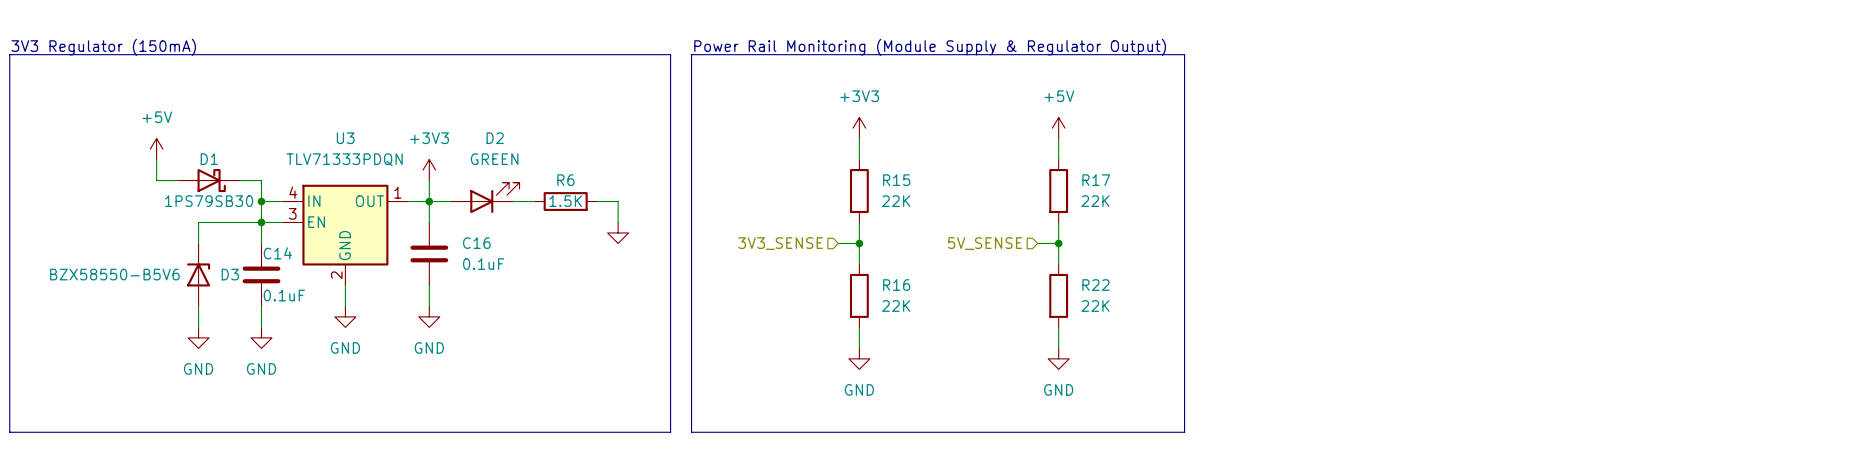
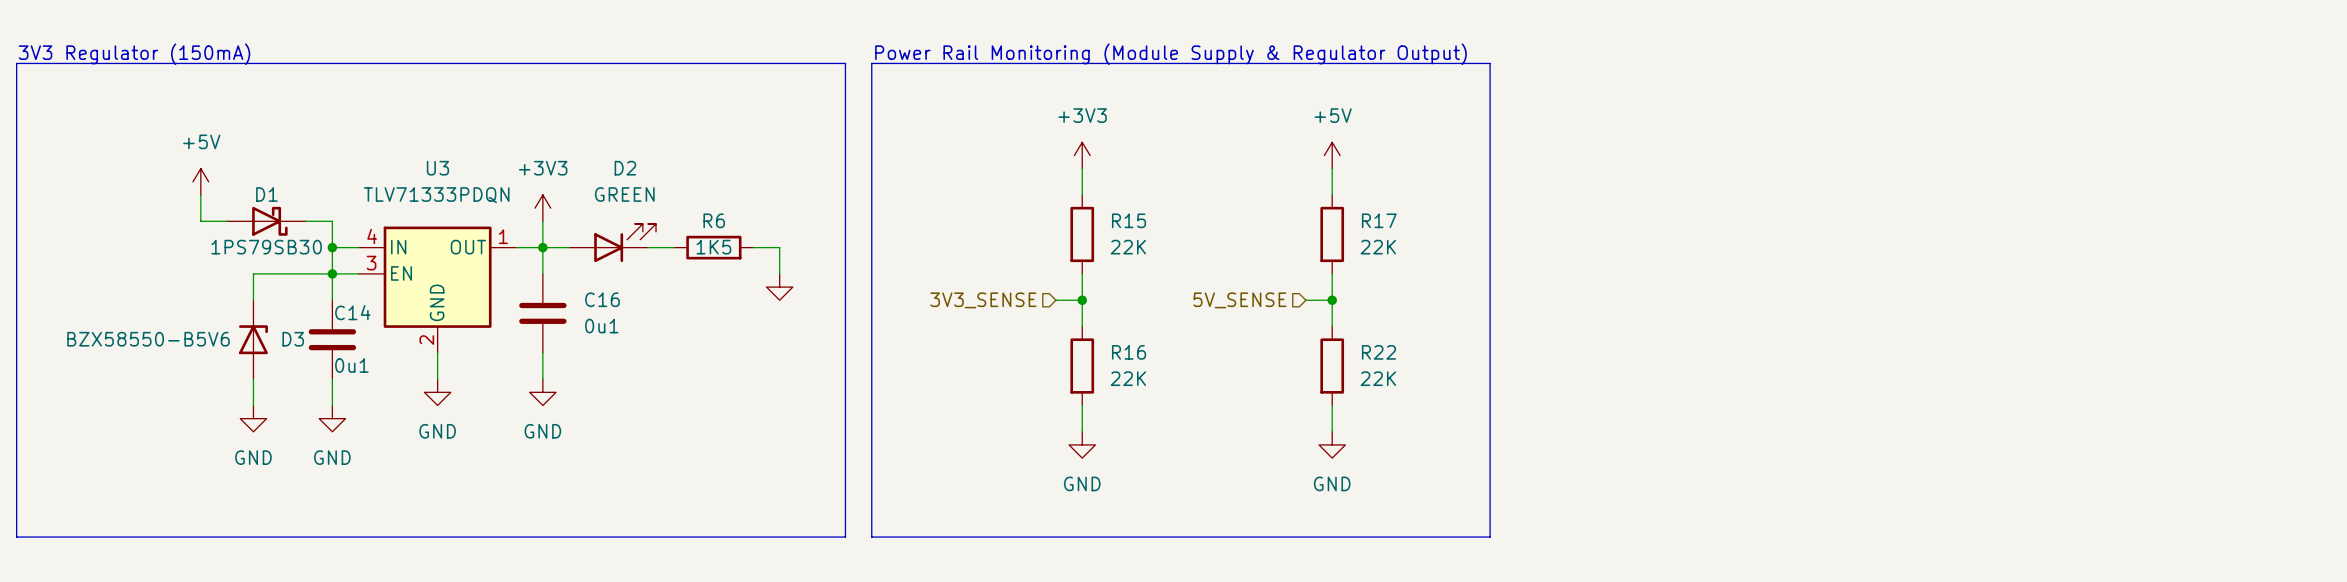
R6 value: 1.5K (565, 201) -> 1K5 (713, 247)
C16 value: 0.1uF (483, 264) -> 0u1 (601, 326)
C14 value: 0.1uF (284, 295) -> 0u1 (351, 365)

